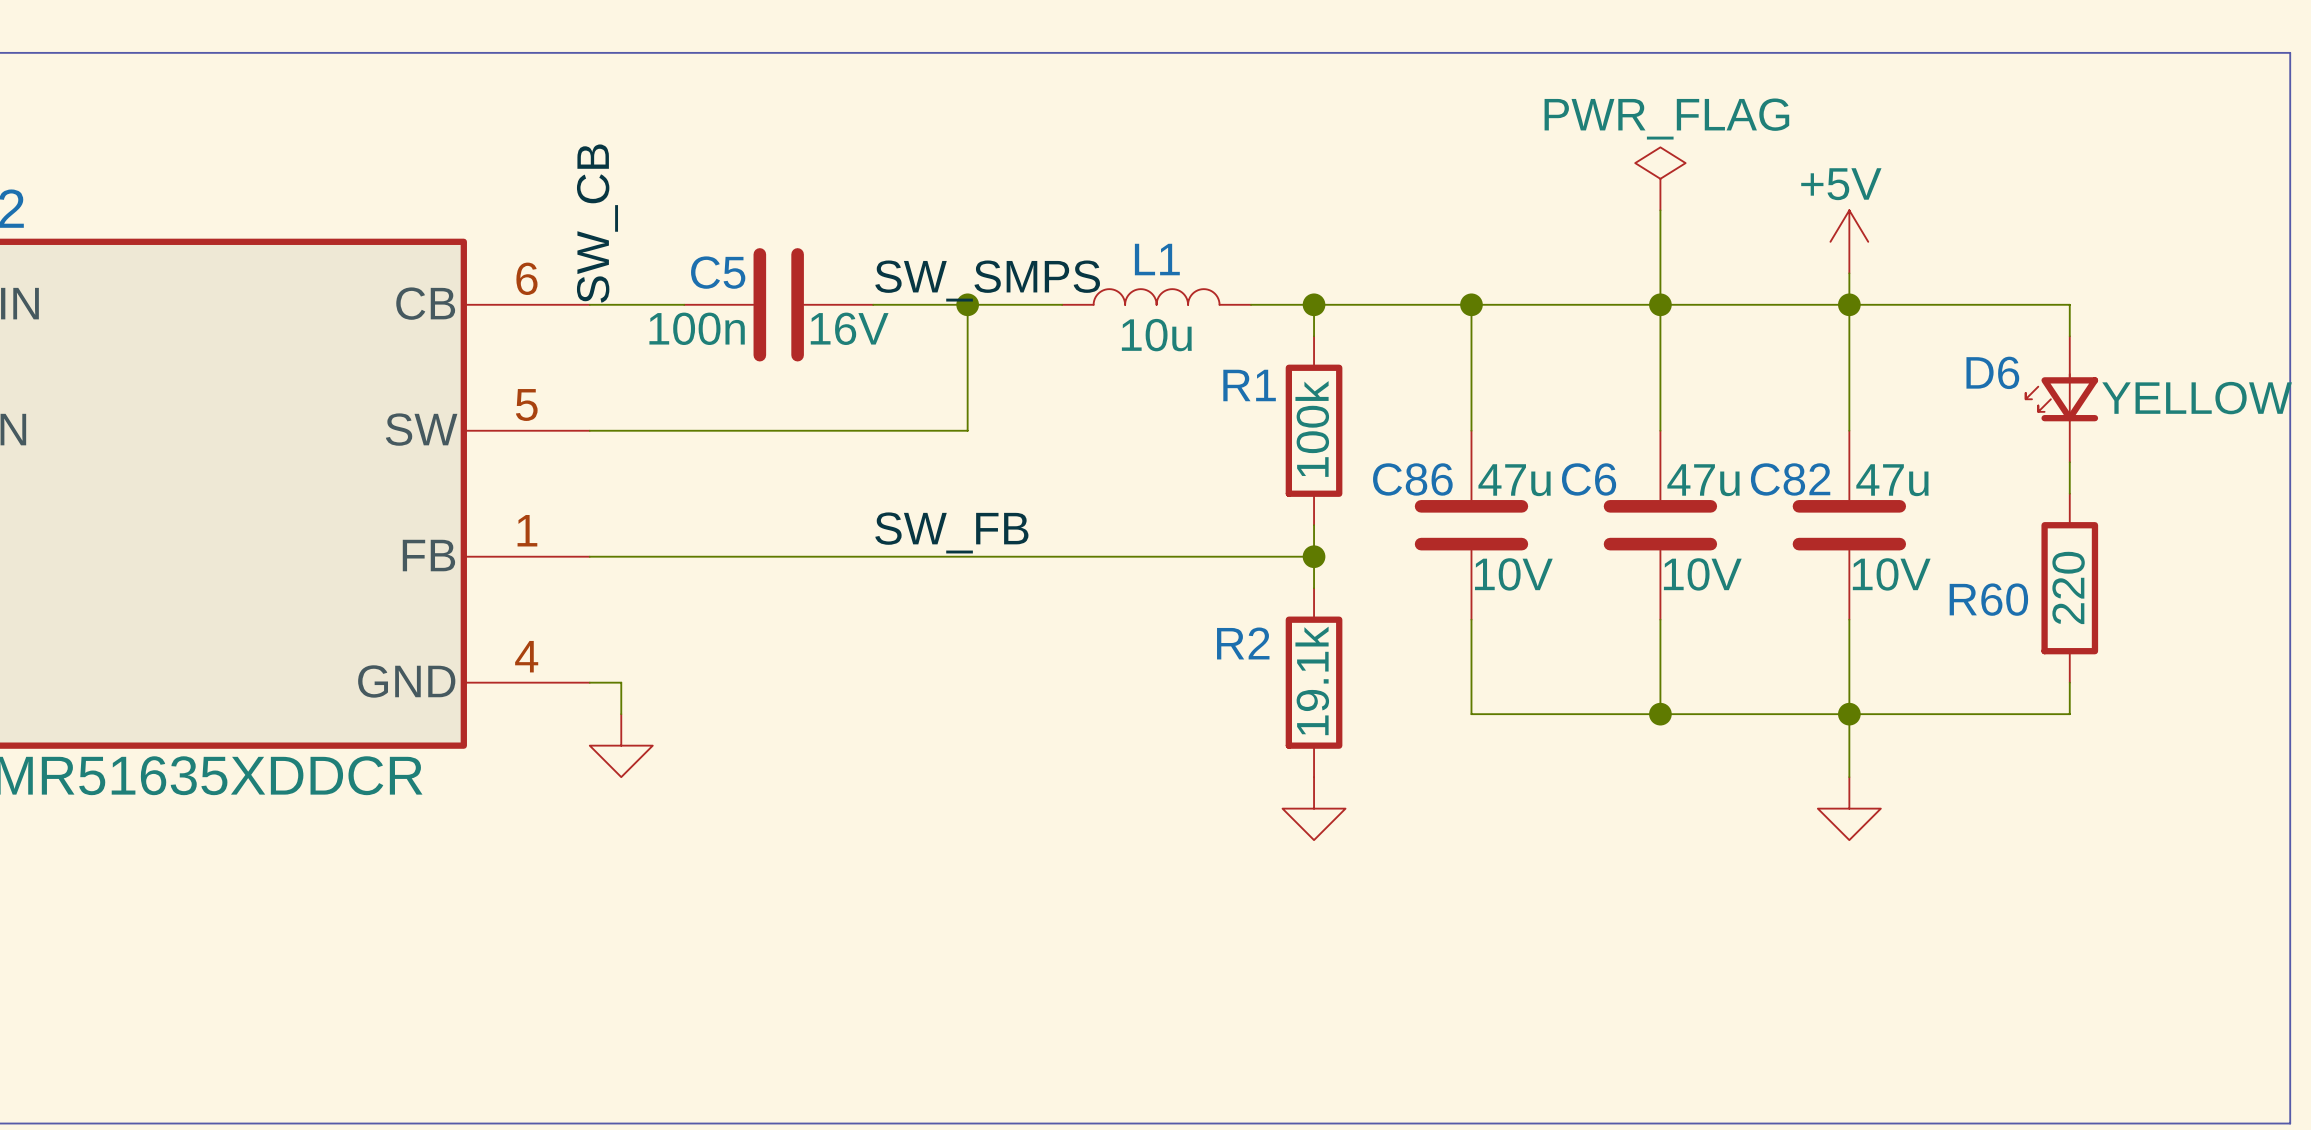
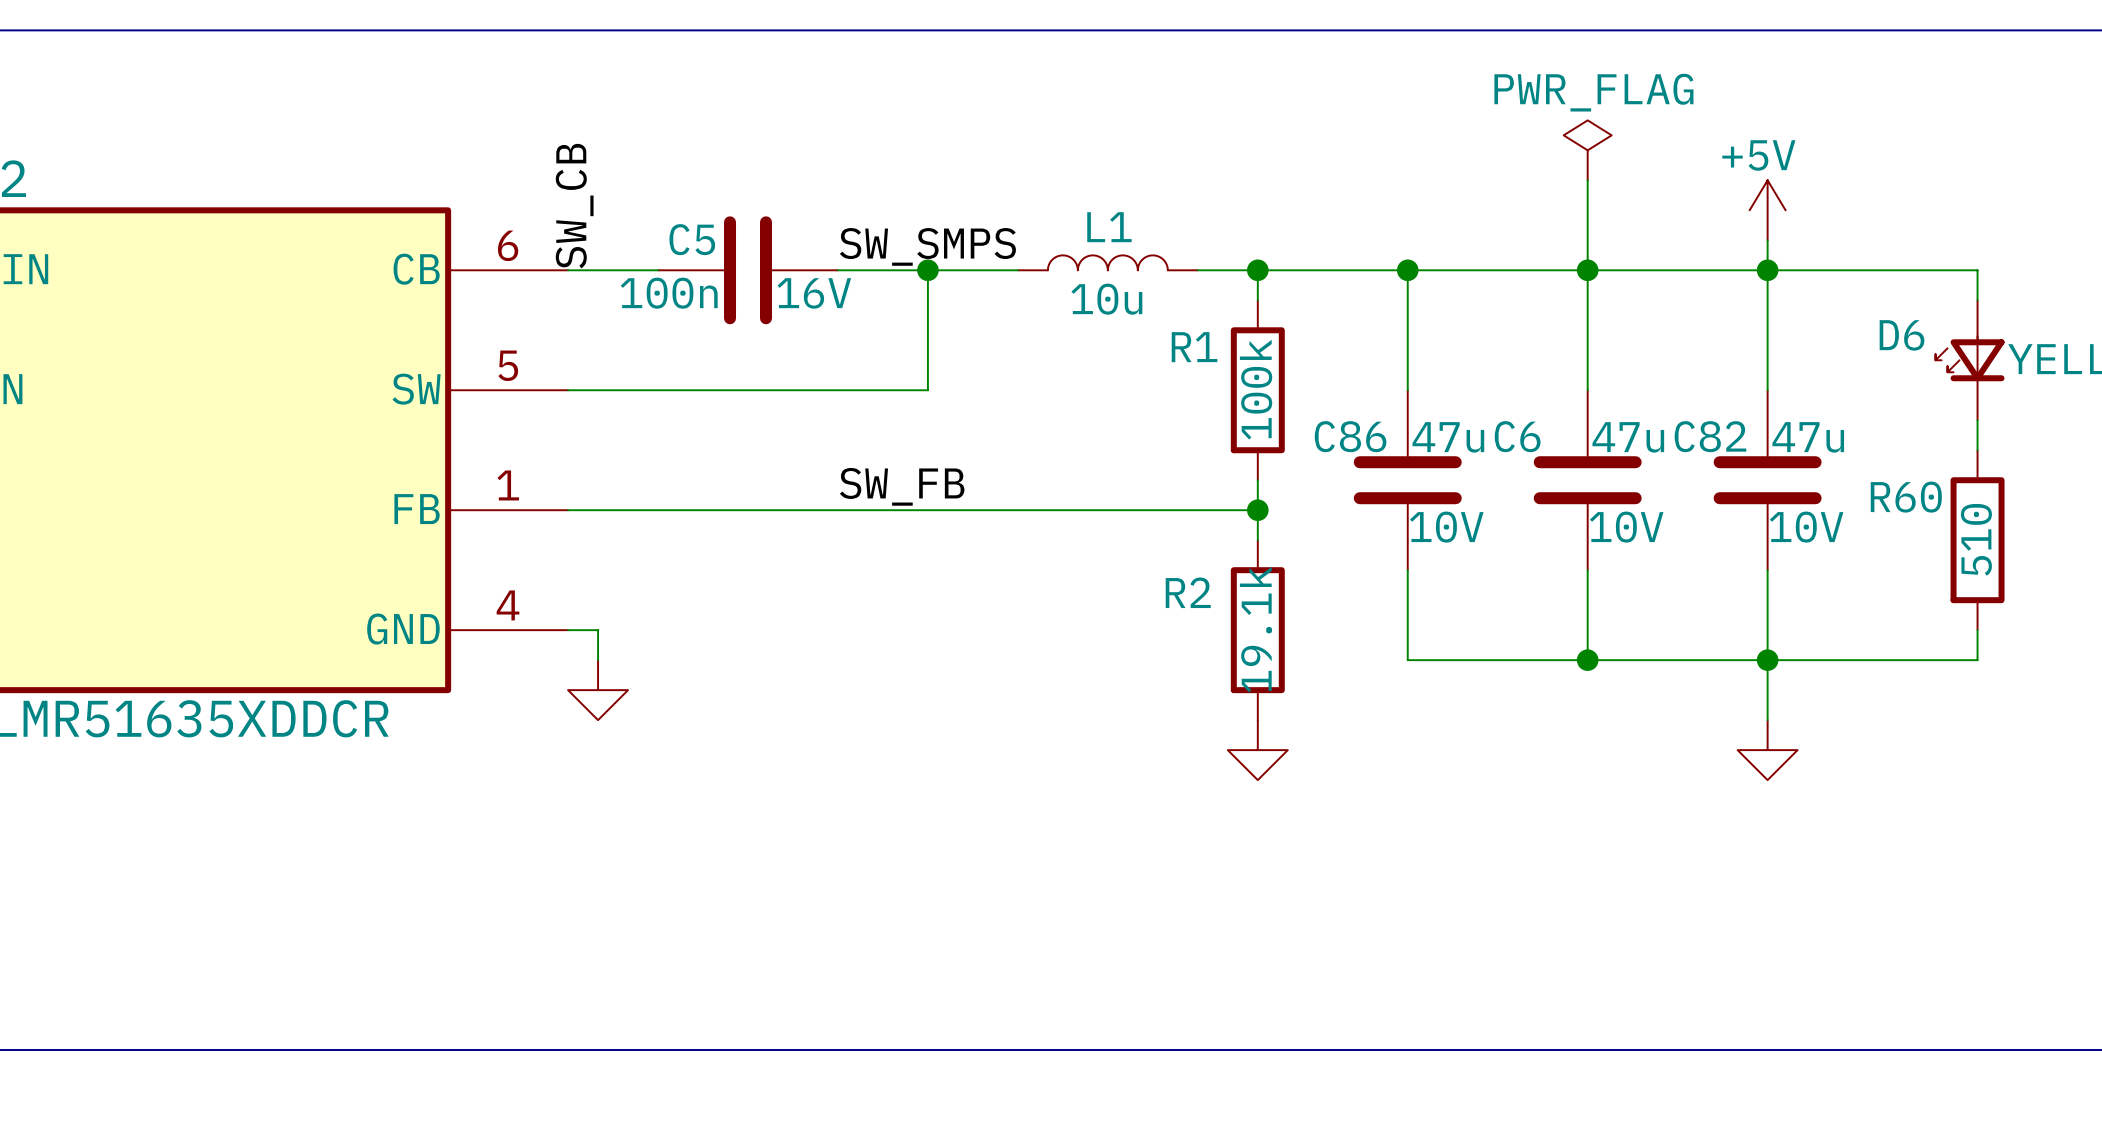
R60 text: 220 (2068, 587) -> 510 (1976, 539)
R60 name position: R60 (1988, 599) -> R60 (1906, 497)

